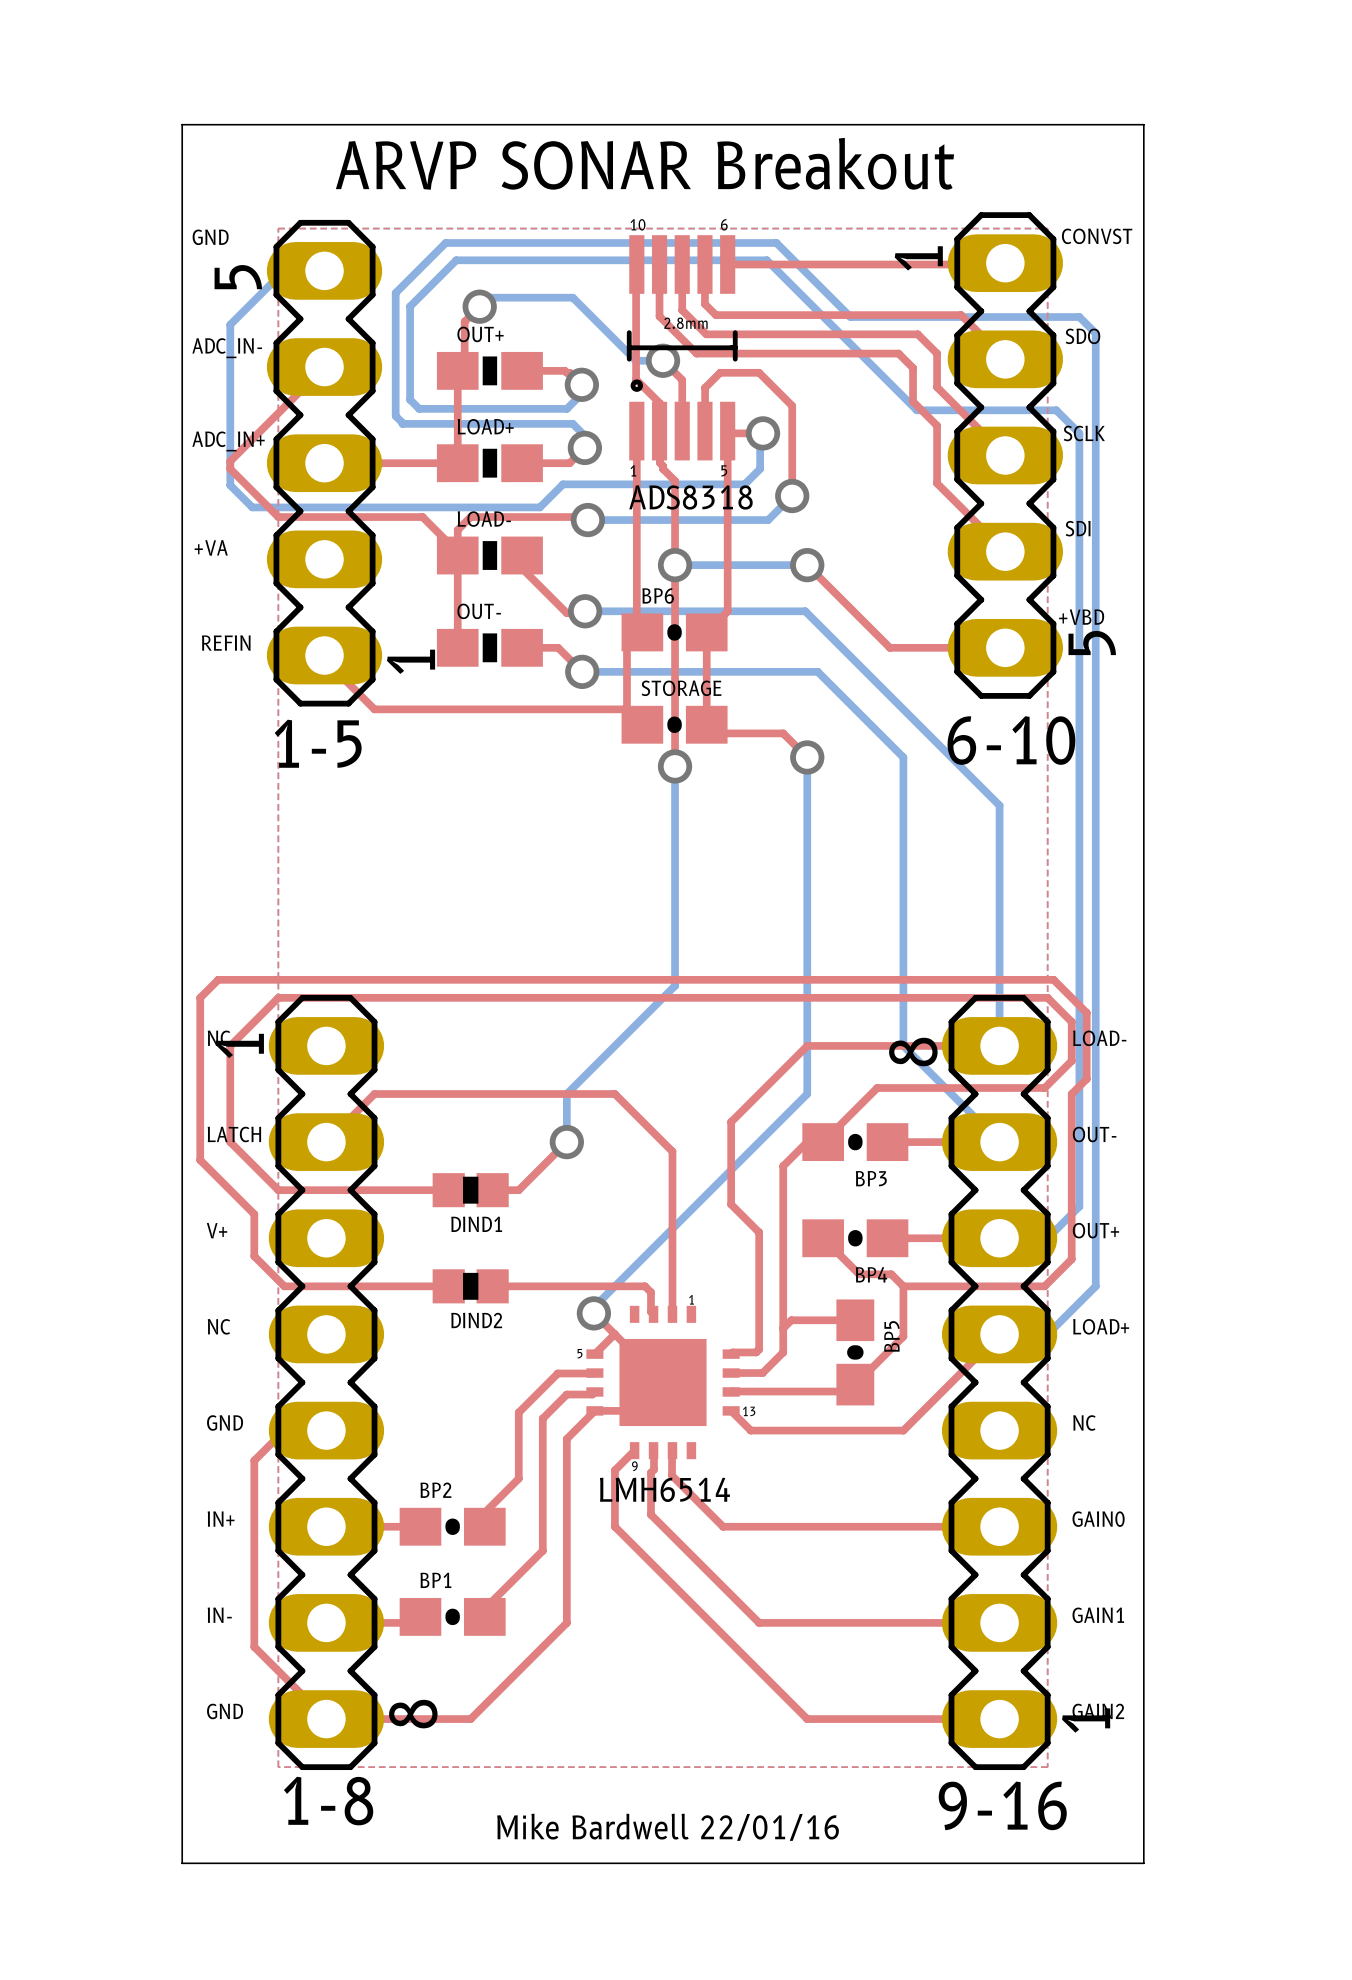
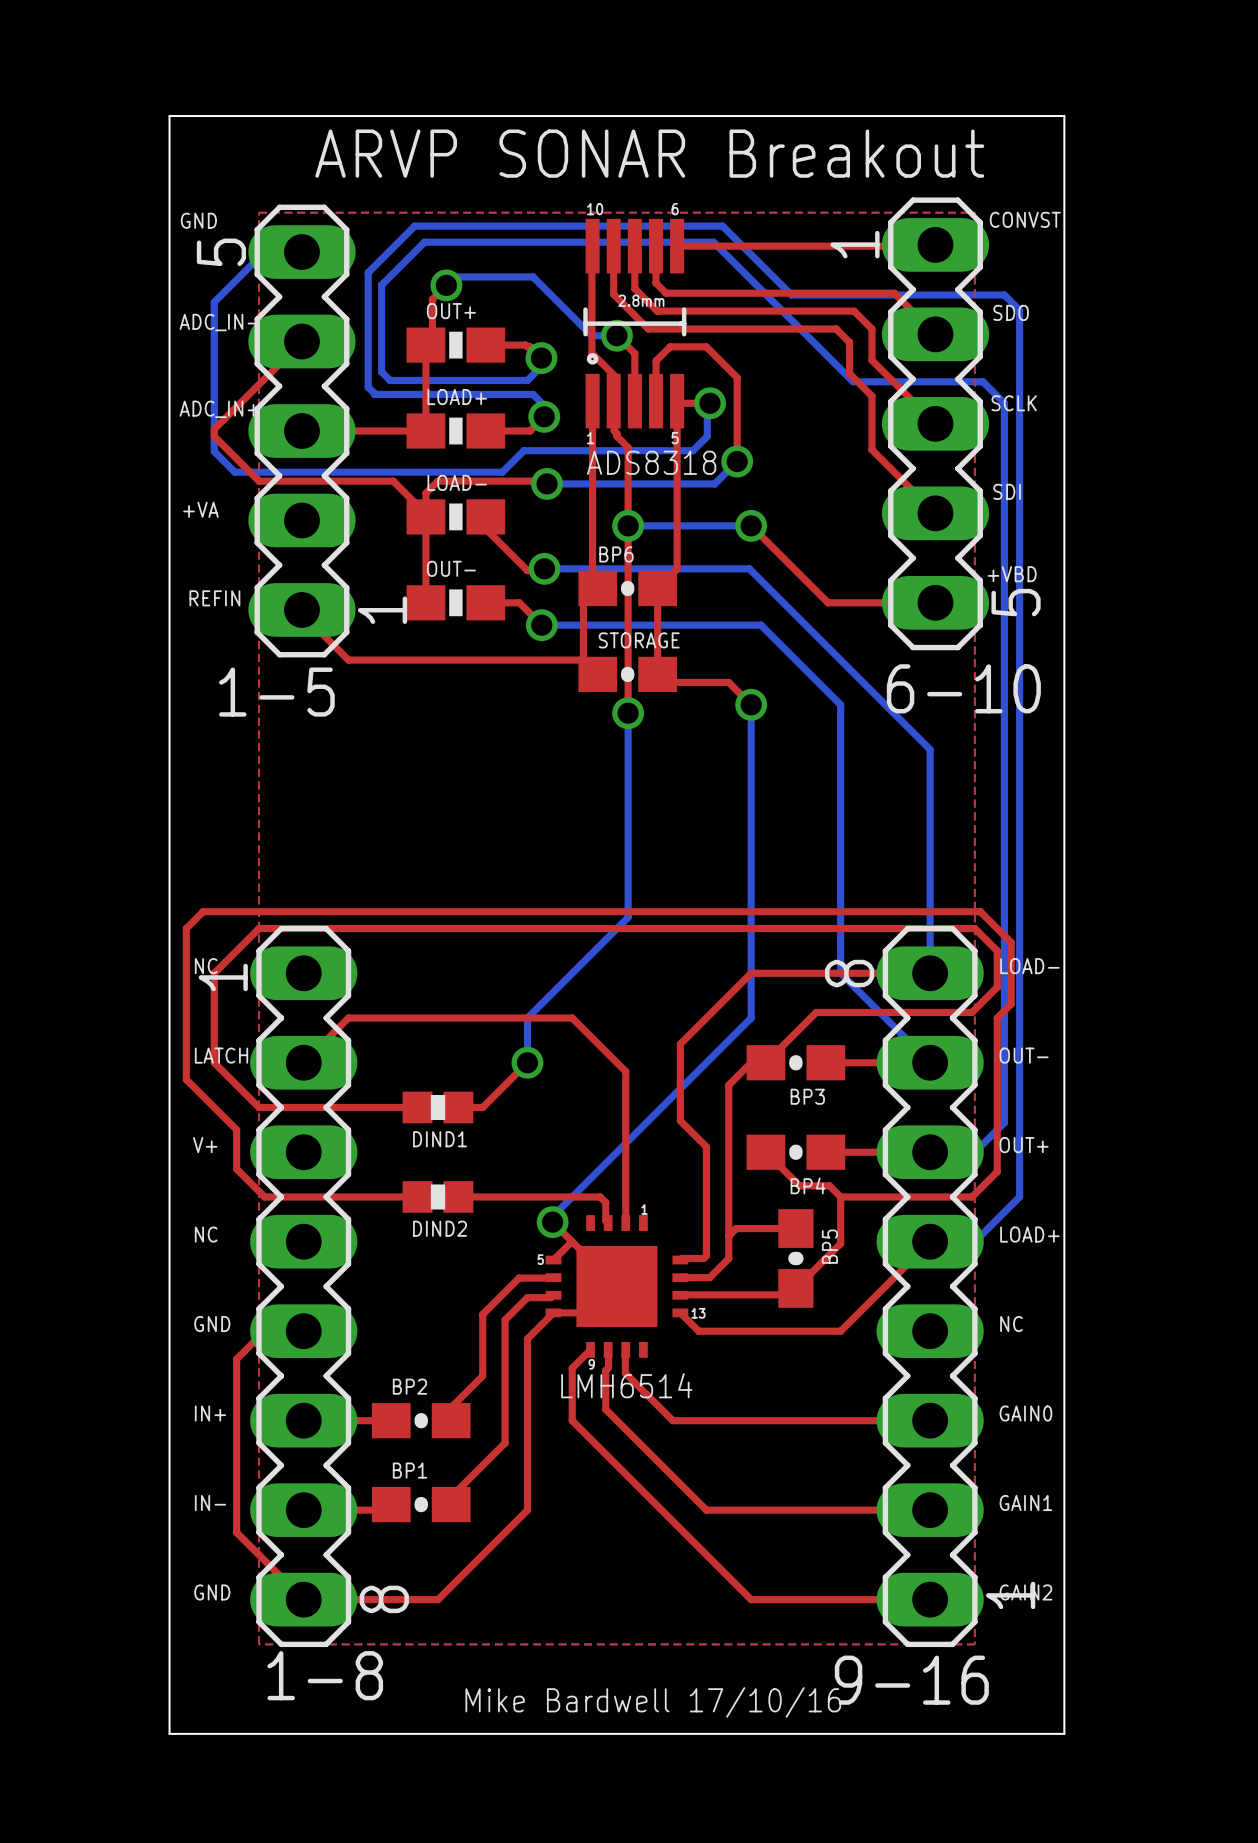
text: Mike Bardwell 22/01/16 (668, 1827) -> Mike Bardwell 17/10/16 (653, 1702)

